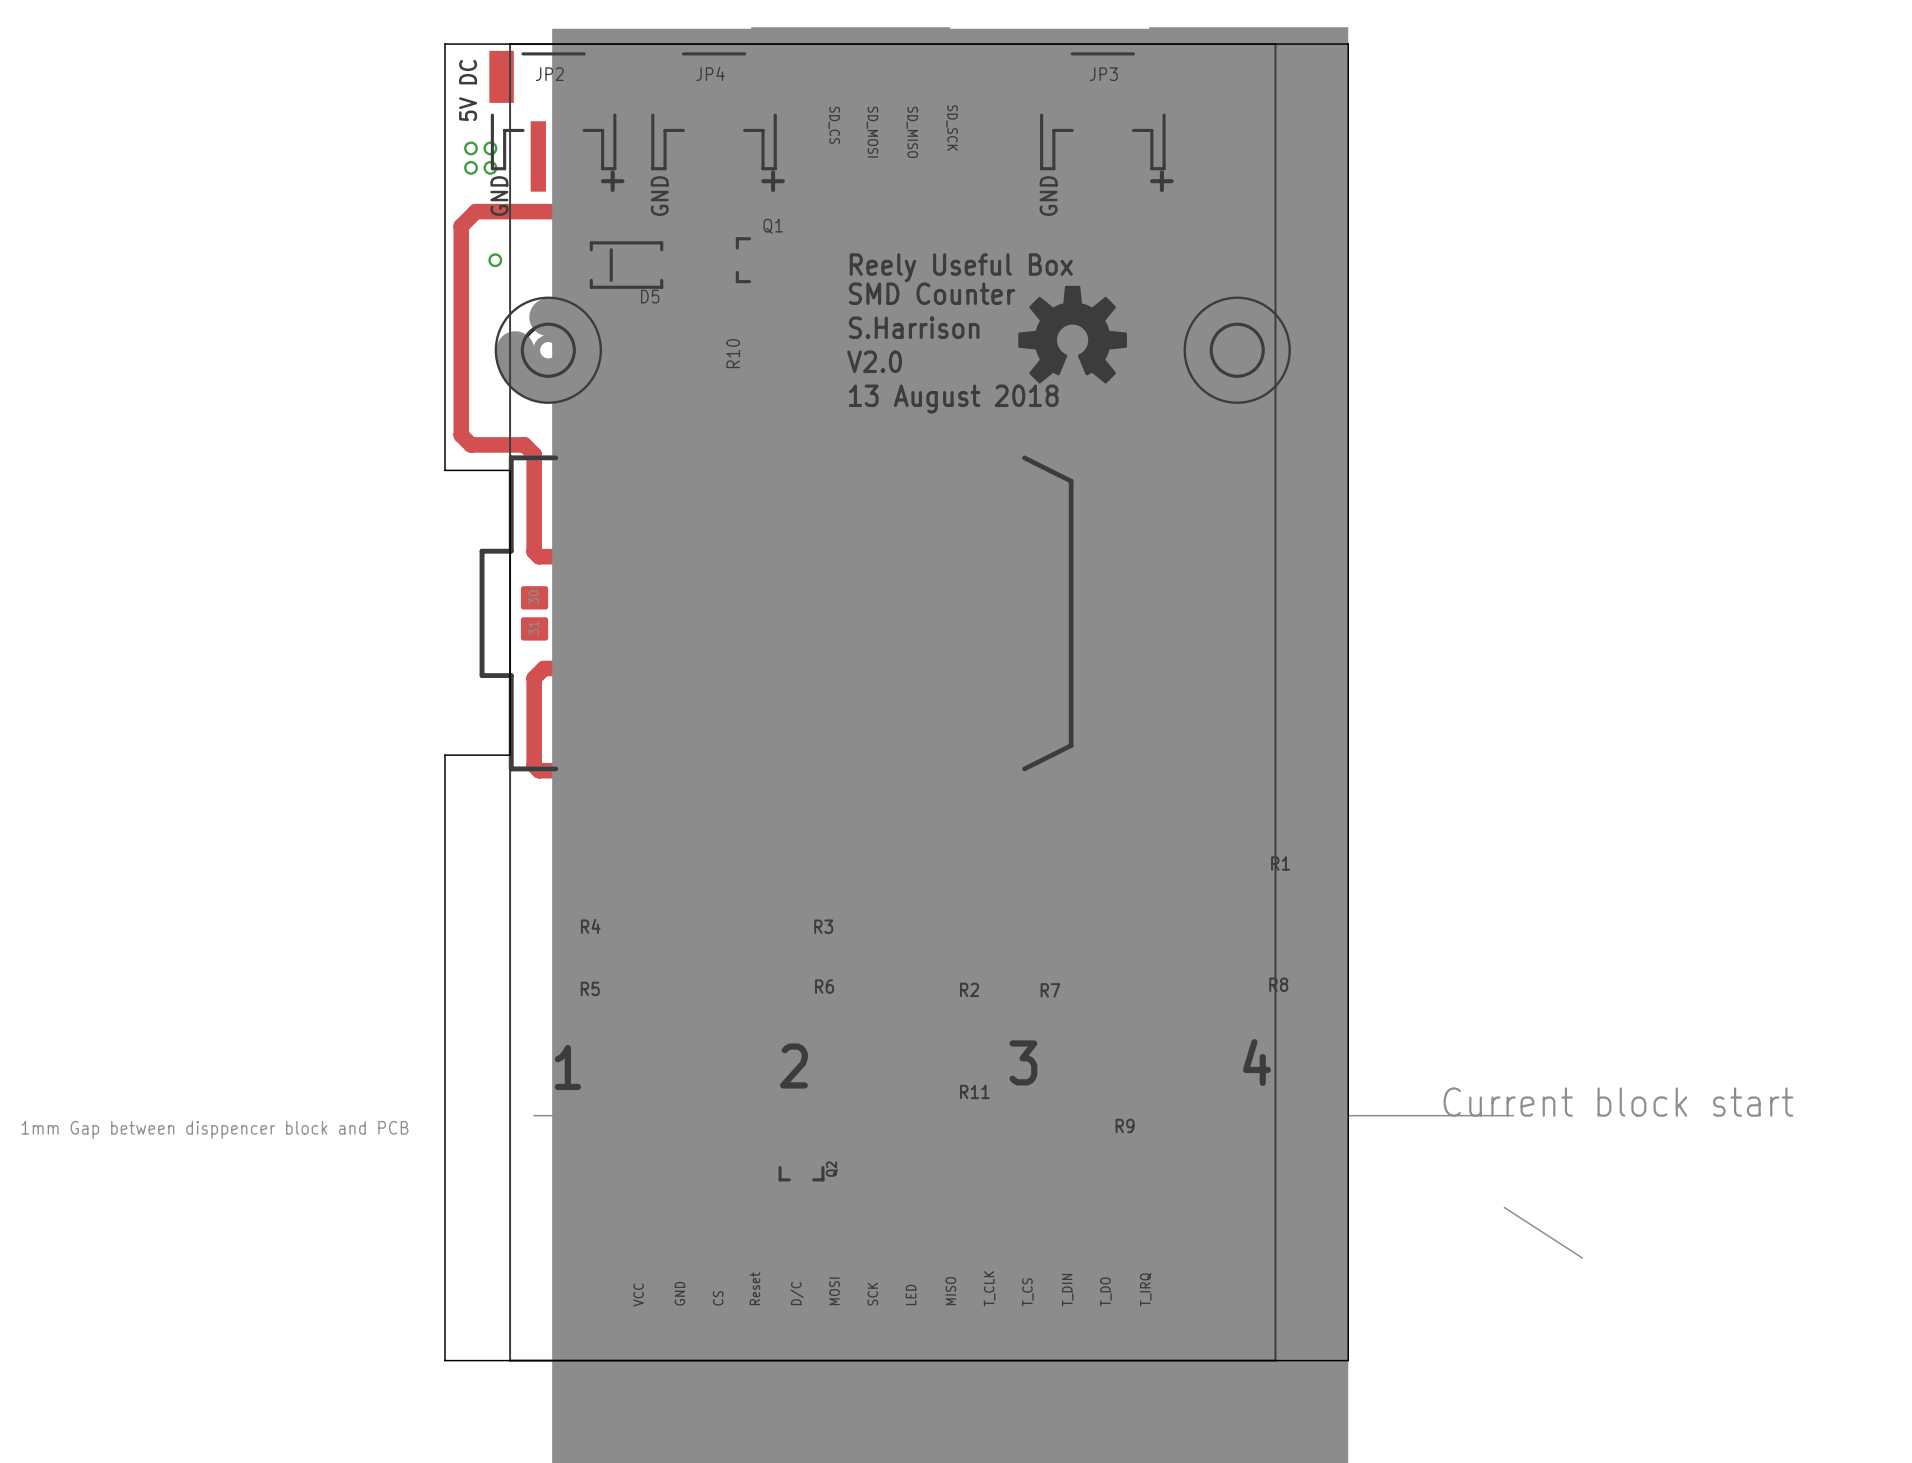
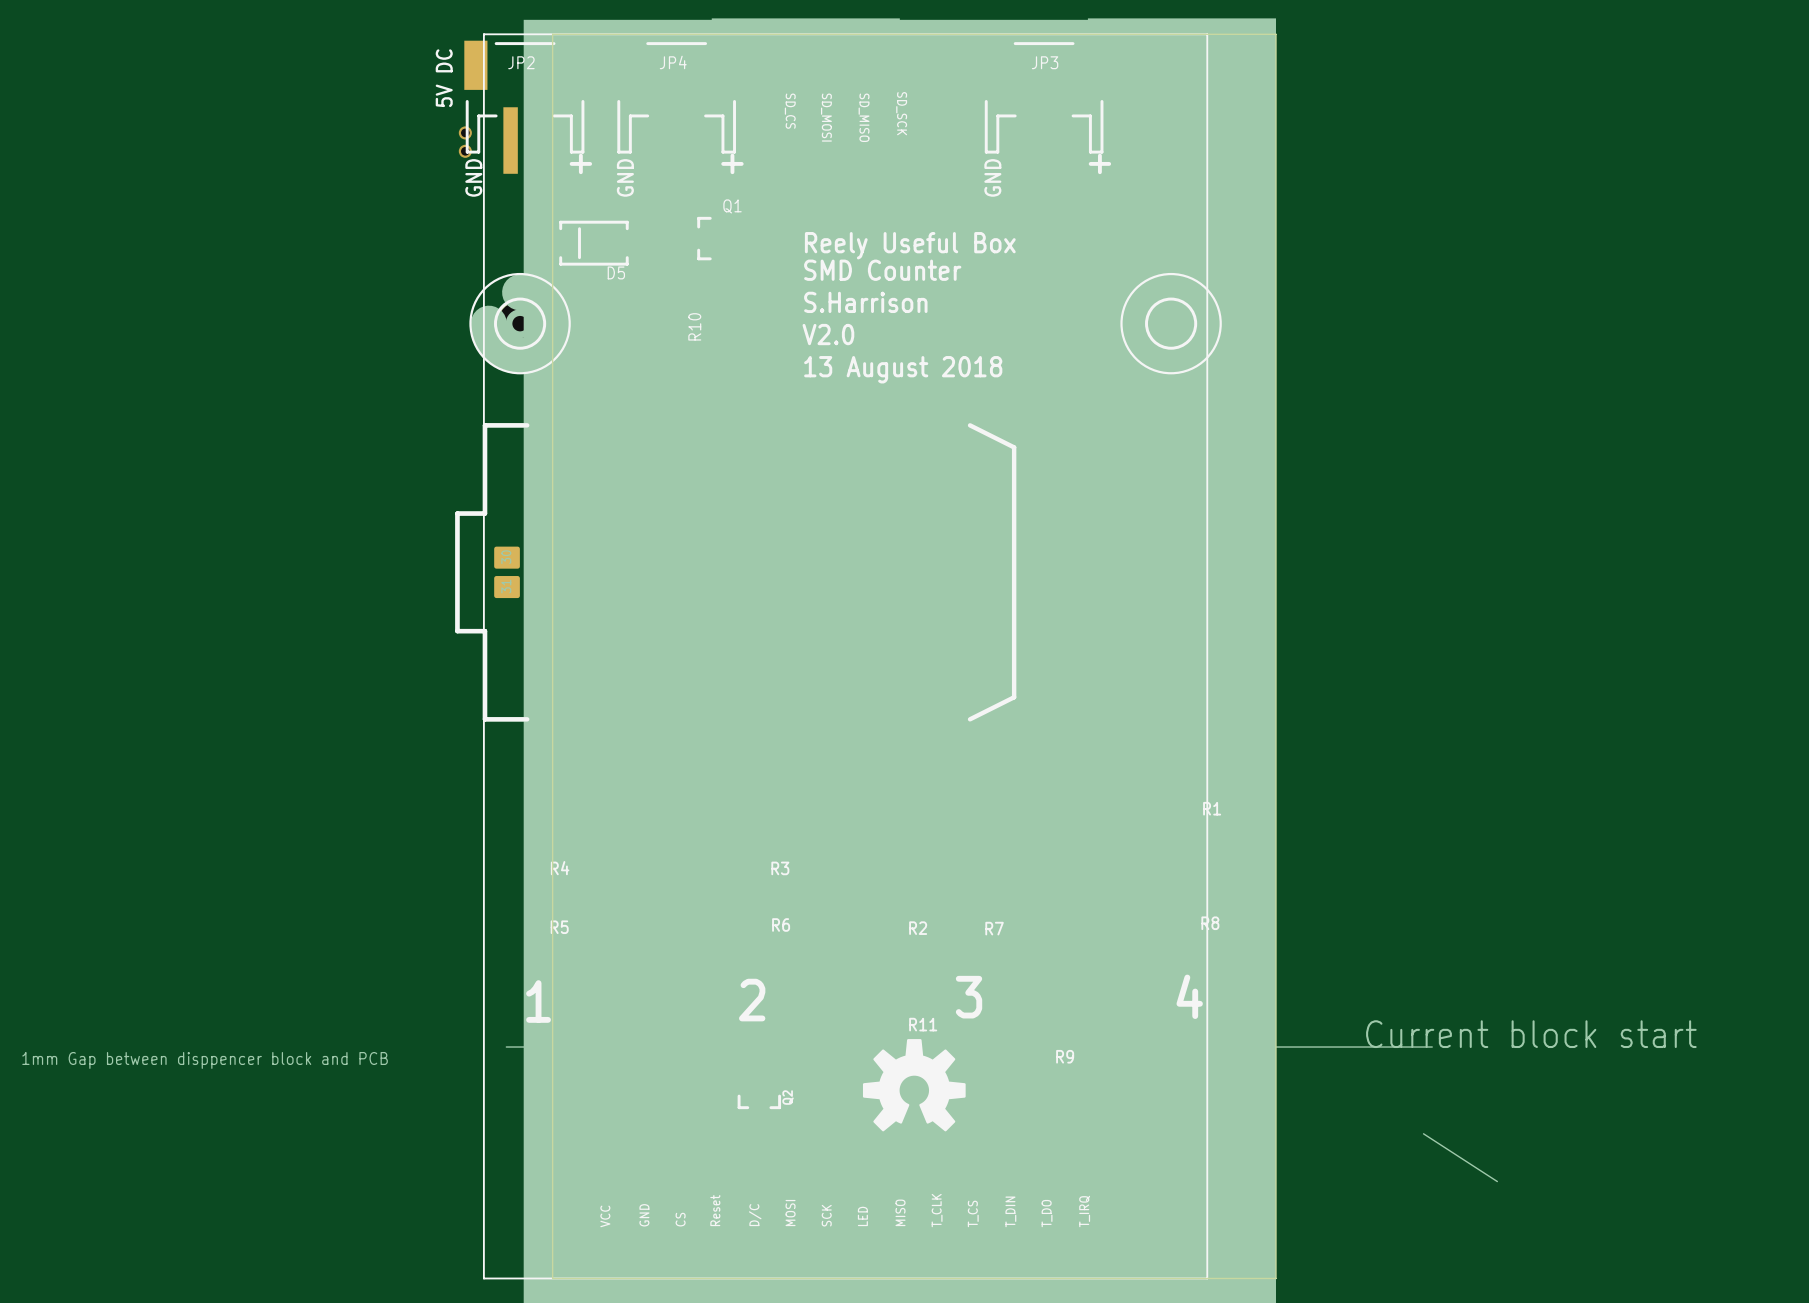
board edge: (582, 44) (445, 44) (445, 470) (510, 470) (510, 755) (445, 755) (445, 1360) (582, 1360) -> (552, 34) (552, 1278)
via: (470, 148) -> none
via: (470, 167) -> none
track: (570, 213) (568, 211) (475, 211) (461, 226) (461, 435) (470, 444) (524, 444) (534, 454) (534, 551) (539, 556) (568, 556) (573, 561) (573, 663) (568, 668) (543, 668) (534, 678) (534, 765) (539, 770) (578, 770) (577, 768) -> none
via: (495, 260) -> none
drawing: [1018, 285, 1127, 384] -> none
drawing: none -> [862, 1039, 966, 1132]

